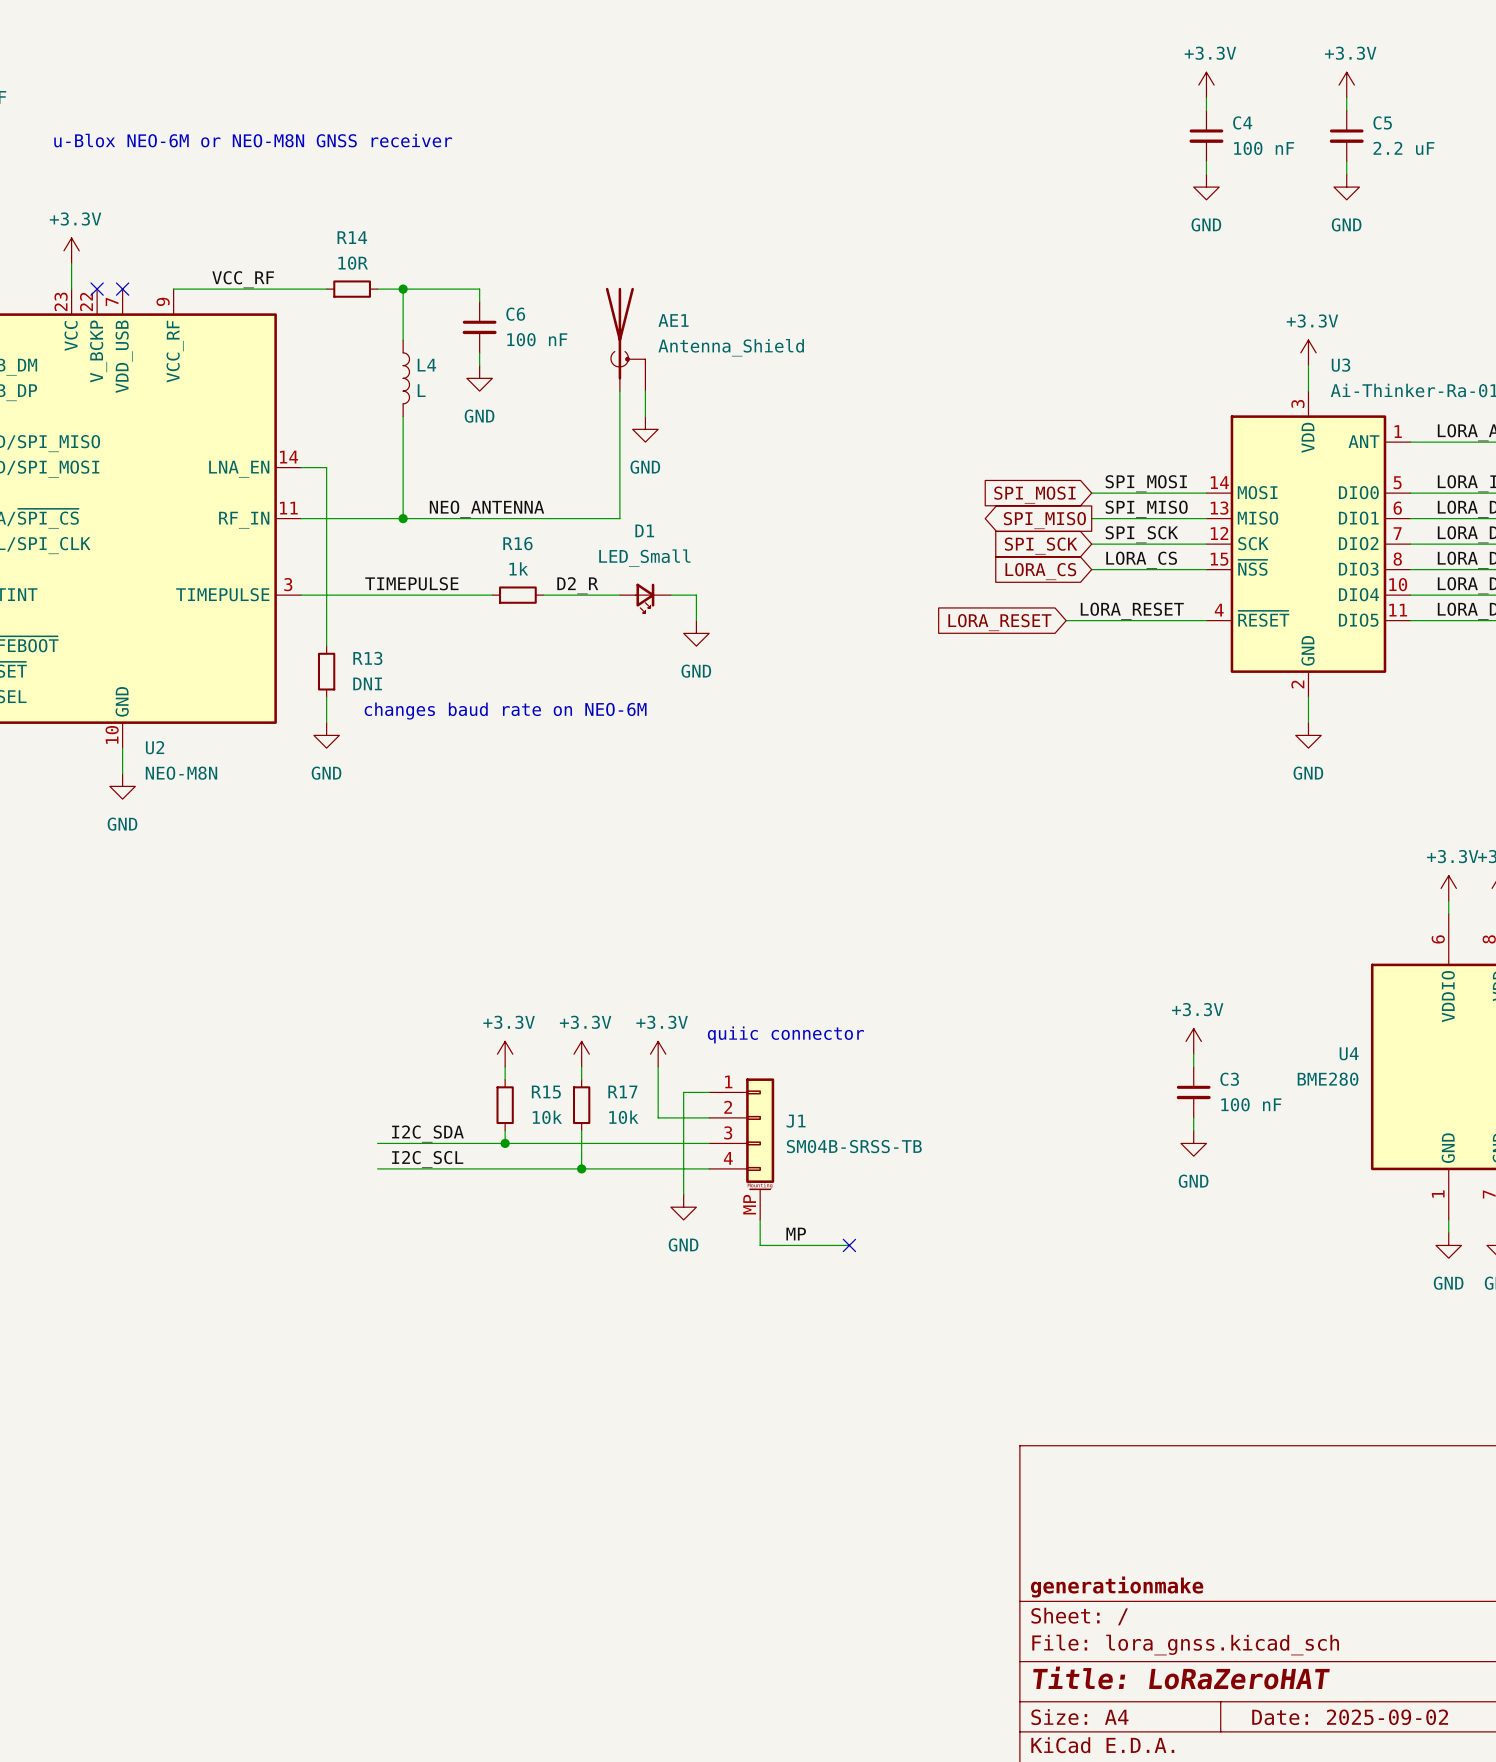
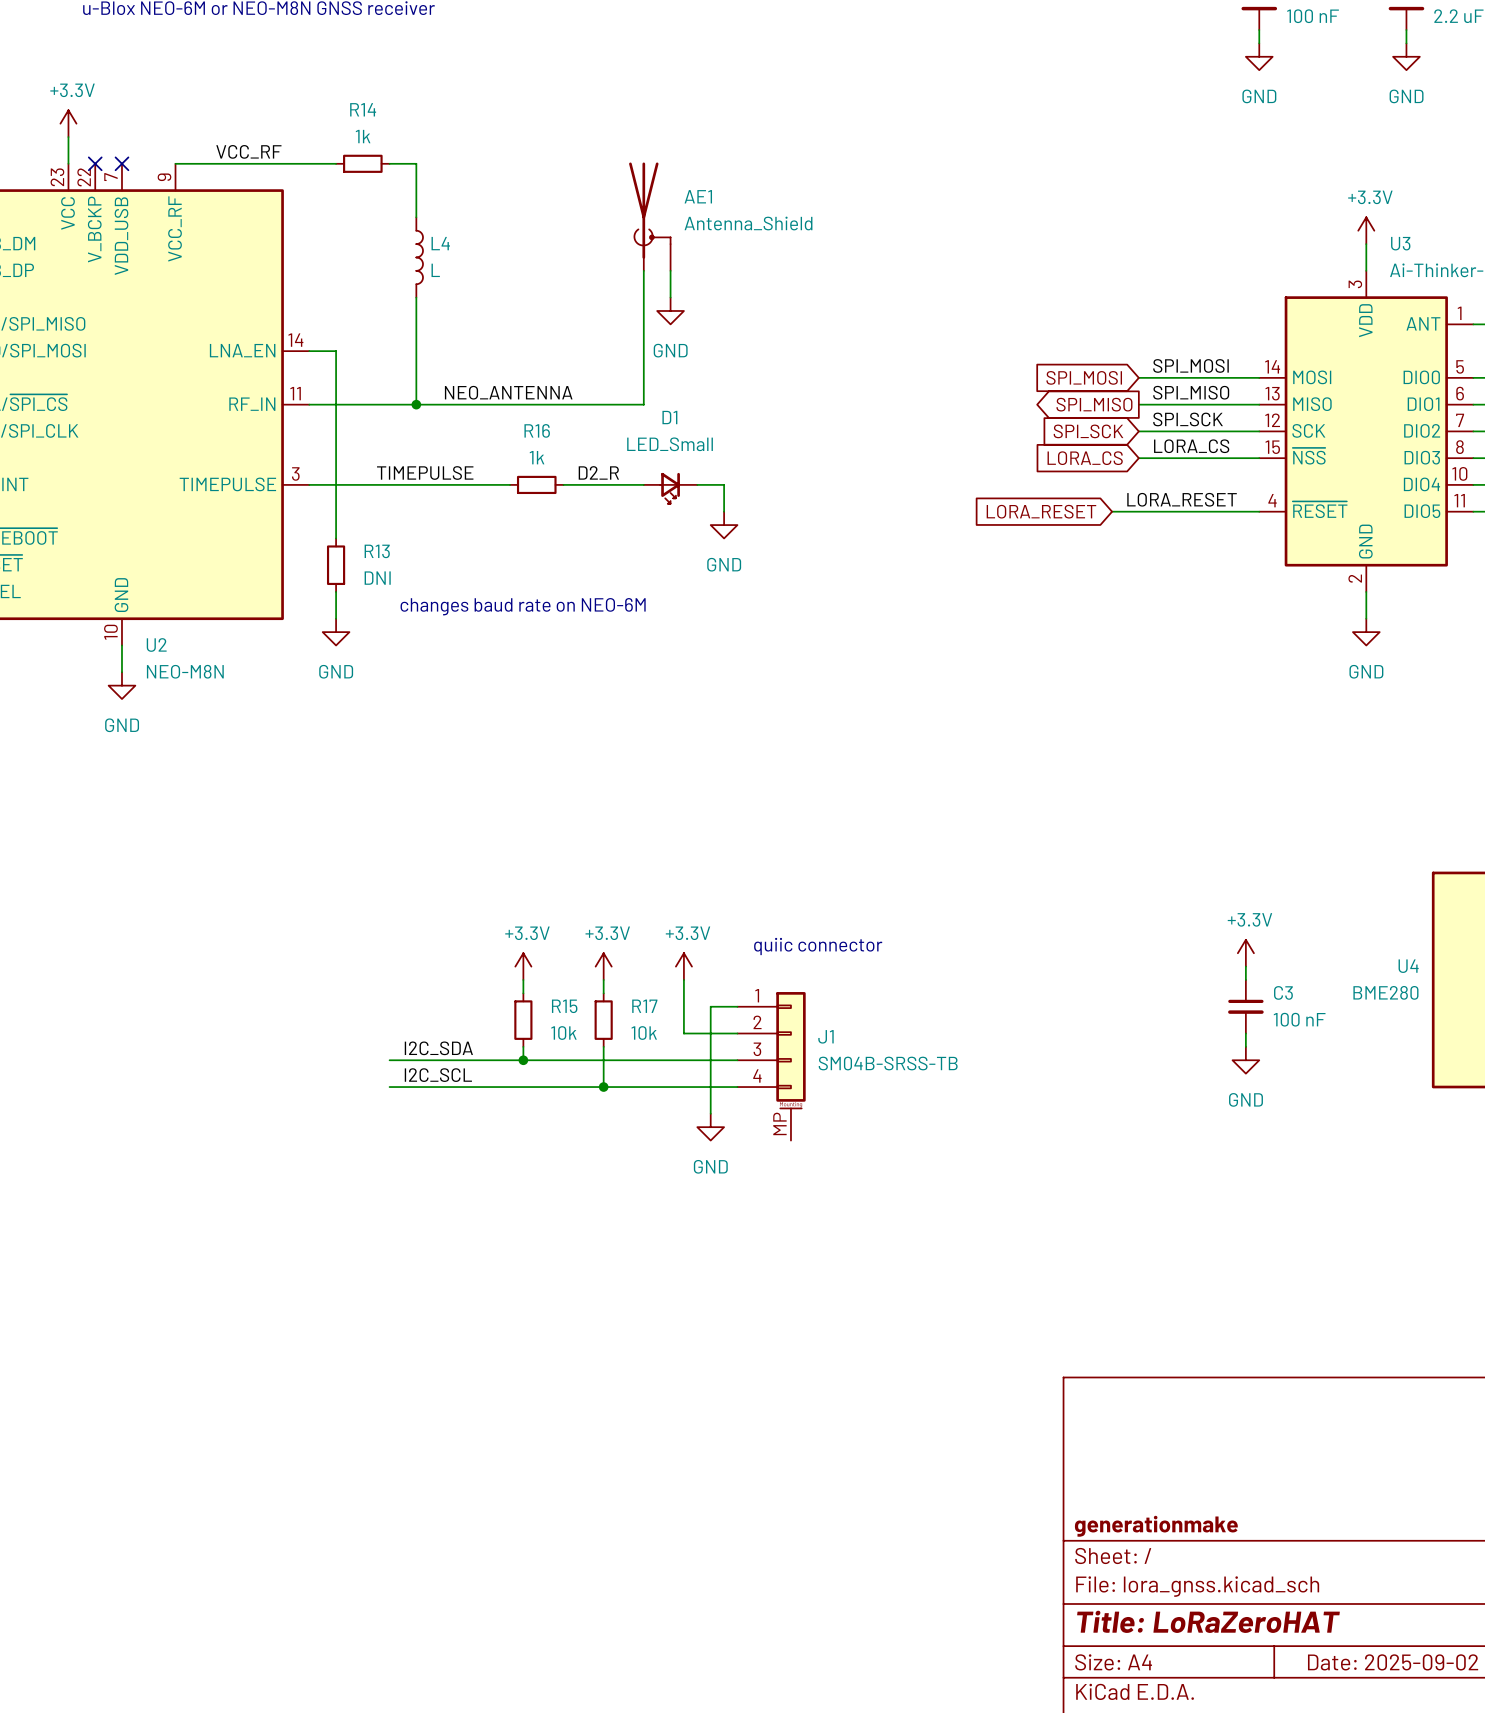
R14 value: 10R (353, 263) -> 1k (363, 136)
wire: (403, 289) (479, 289) (479, 301) -> none
junction: (403, 289) -> none
C6: 100 nF (479, 327) -> none
wire: (479, 352) (479, 365) -> none
power symbol: GND (479, 378) -> none
wire: (760, 1219) (760, 1245) (849, 1245) -> none
label: MP (796, 1234) -> none
no-connect mark: (849, 1245) -> none

